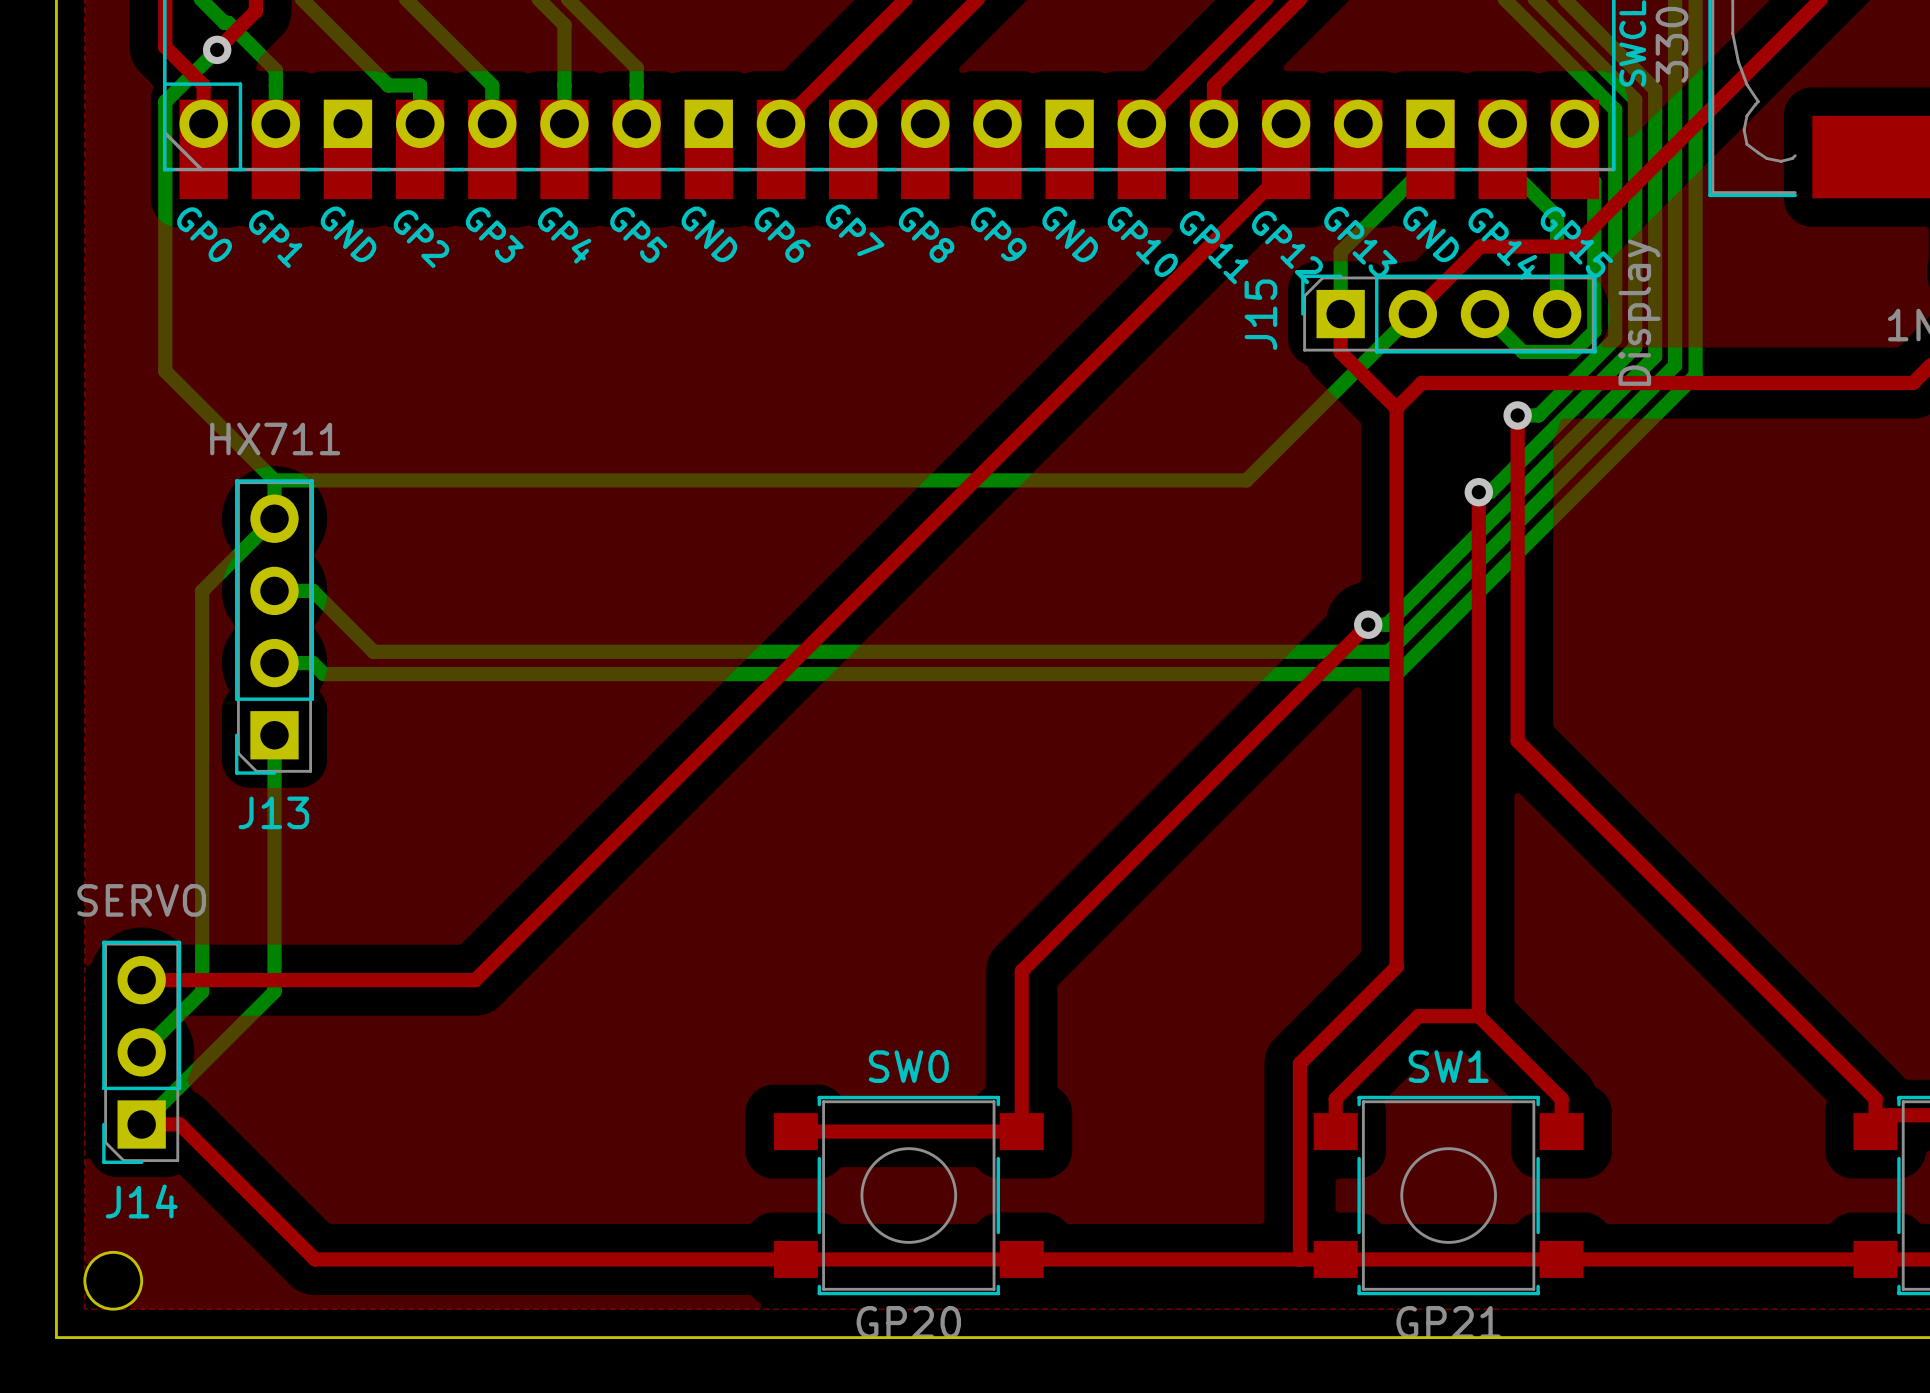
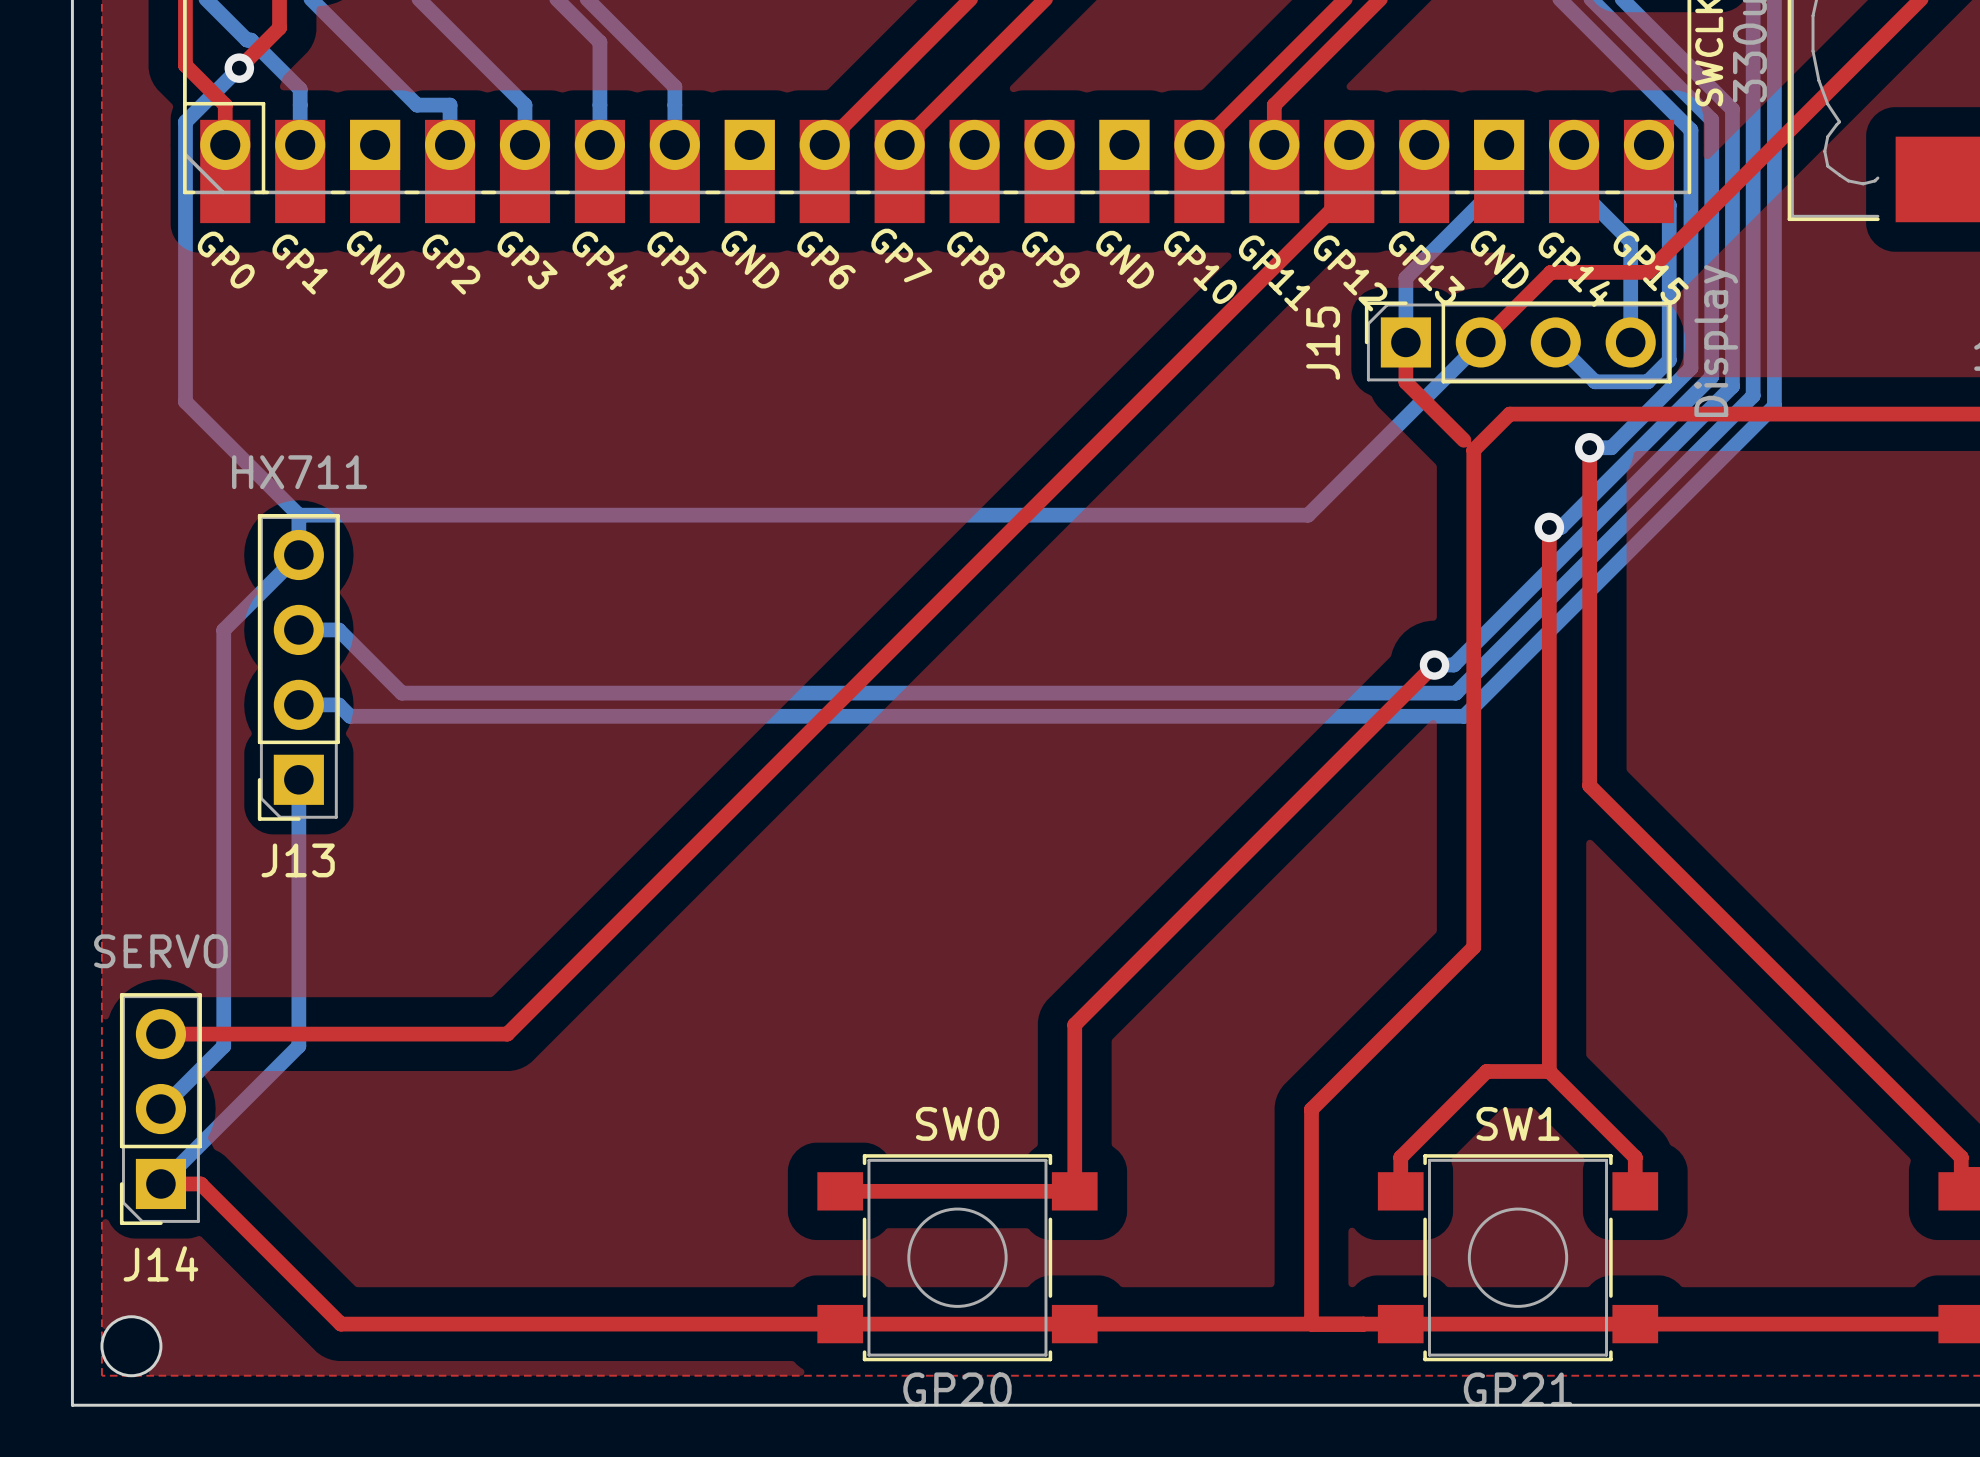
top track: (1440, 383) (1421, 383) (1396, 408) (1396, 967) (1299, 1063) (1299, 1259) -> (1509, 414) (1473, 450) (1473, 947) (1311, 1109) (1311, 1324)

